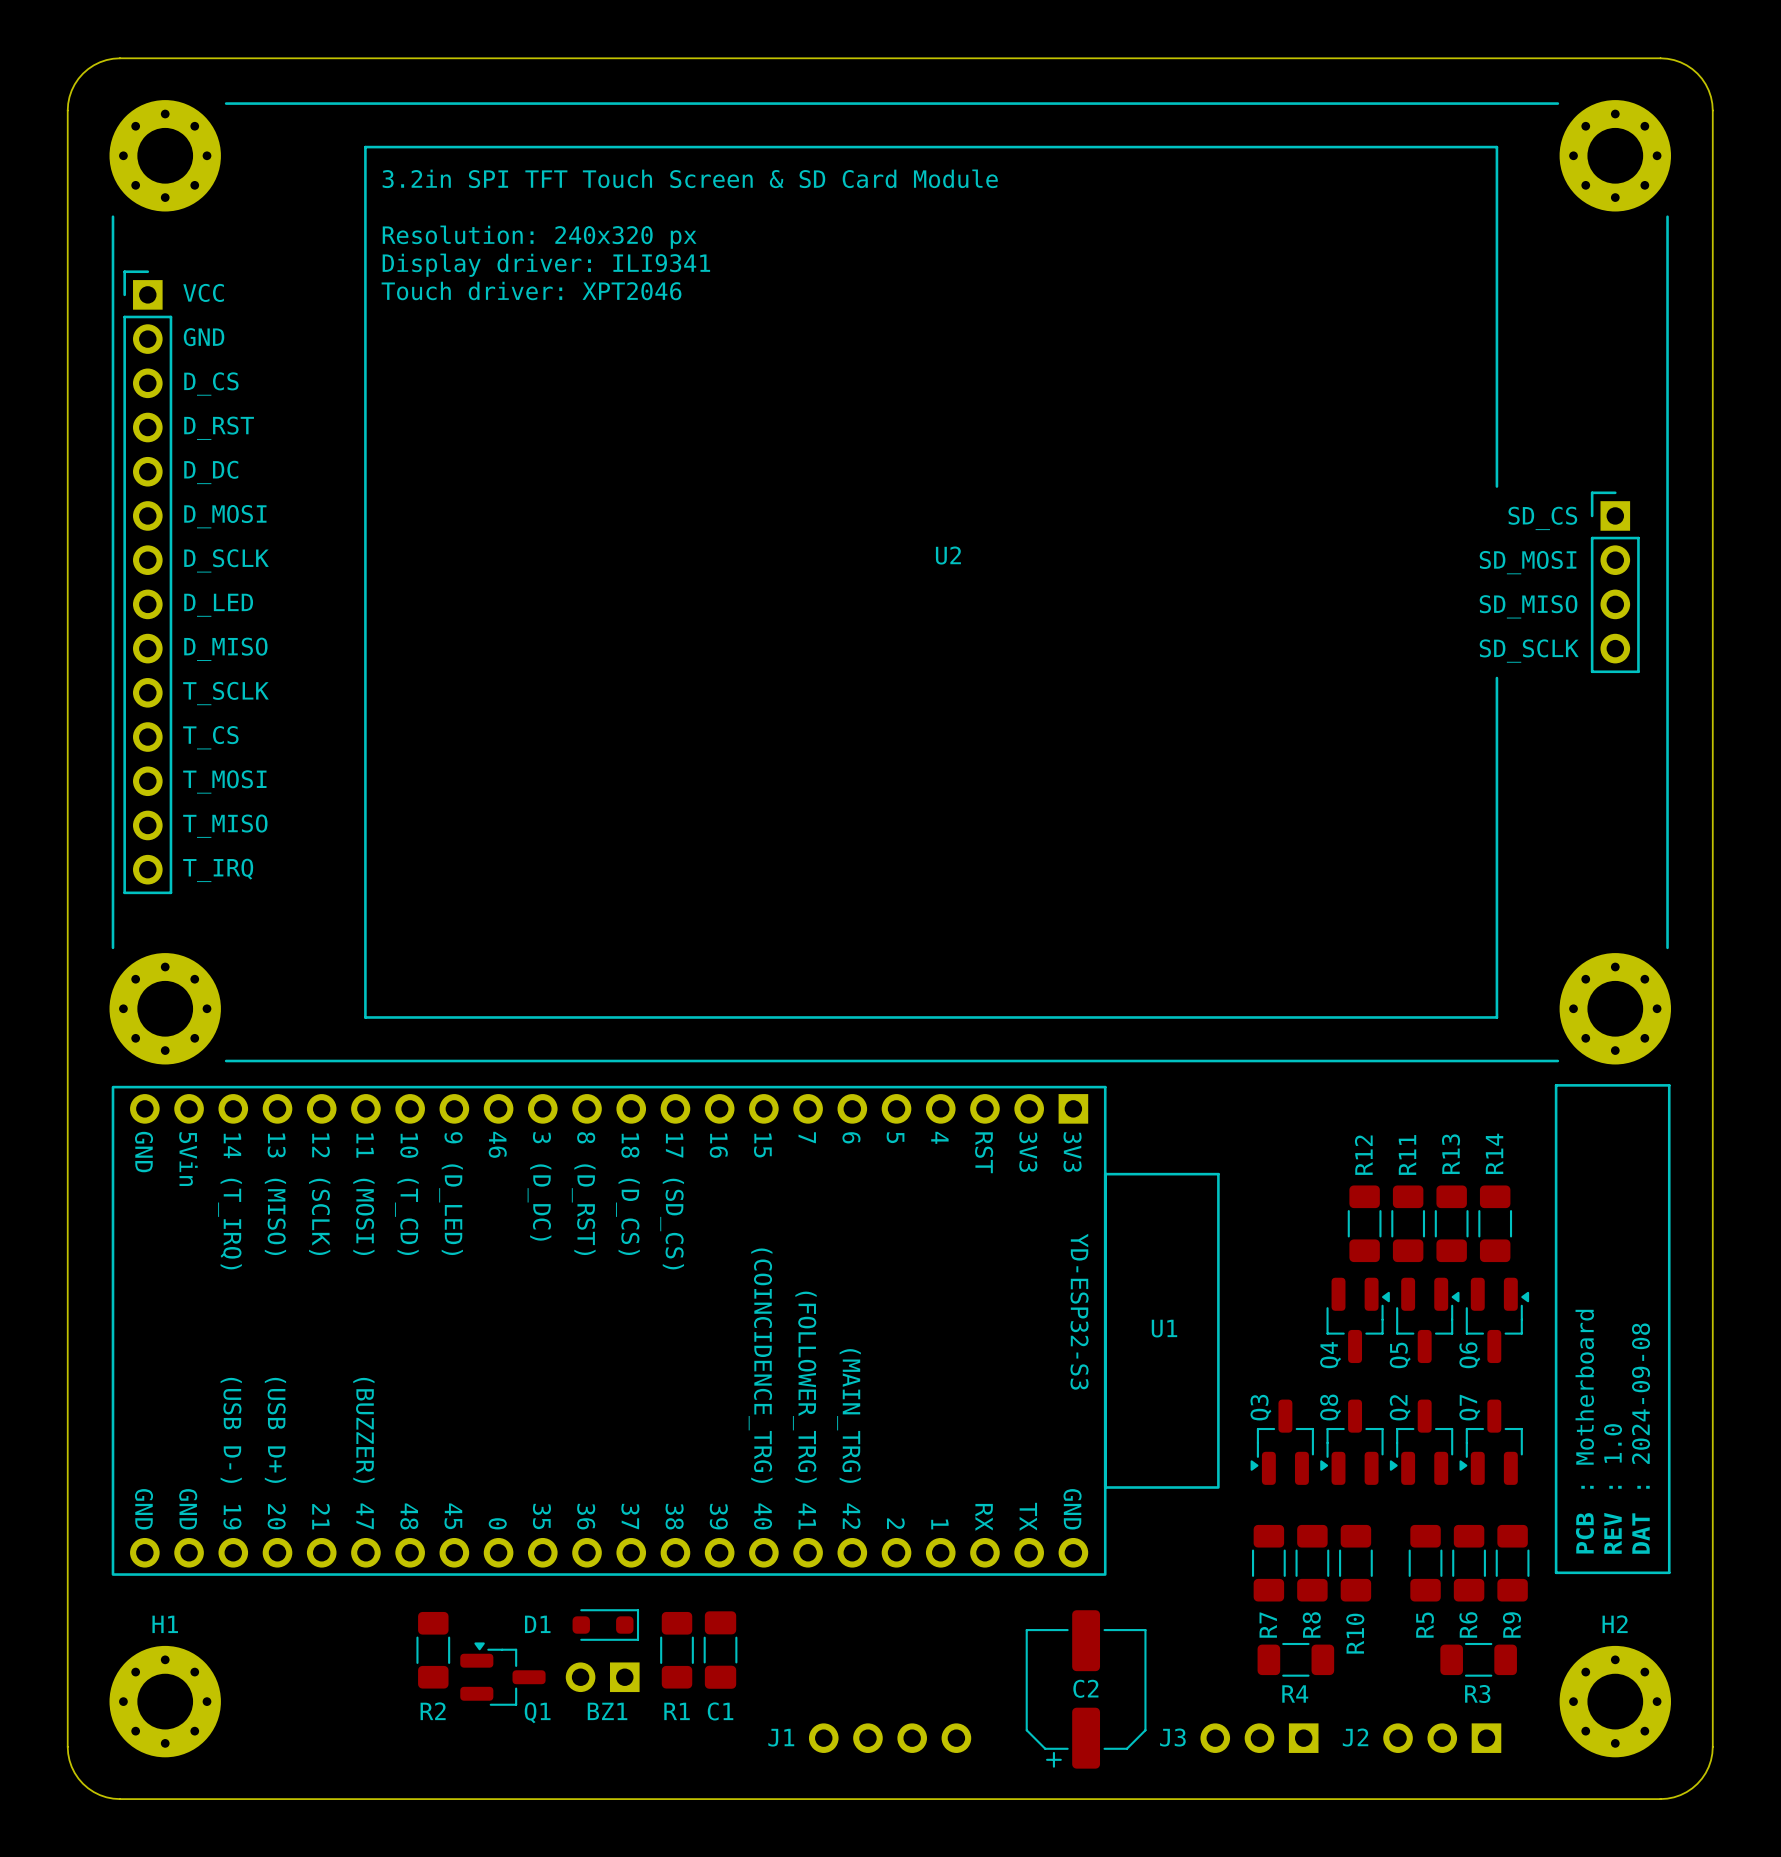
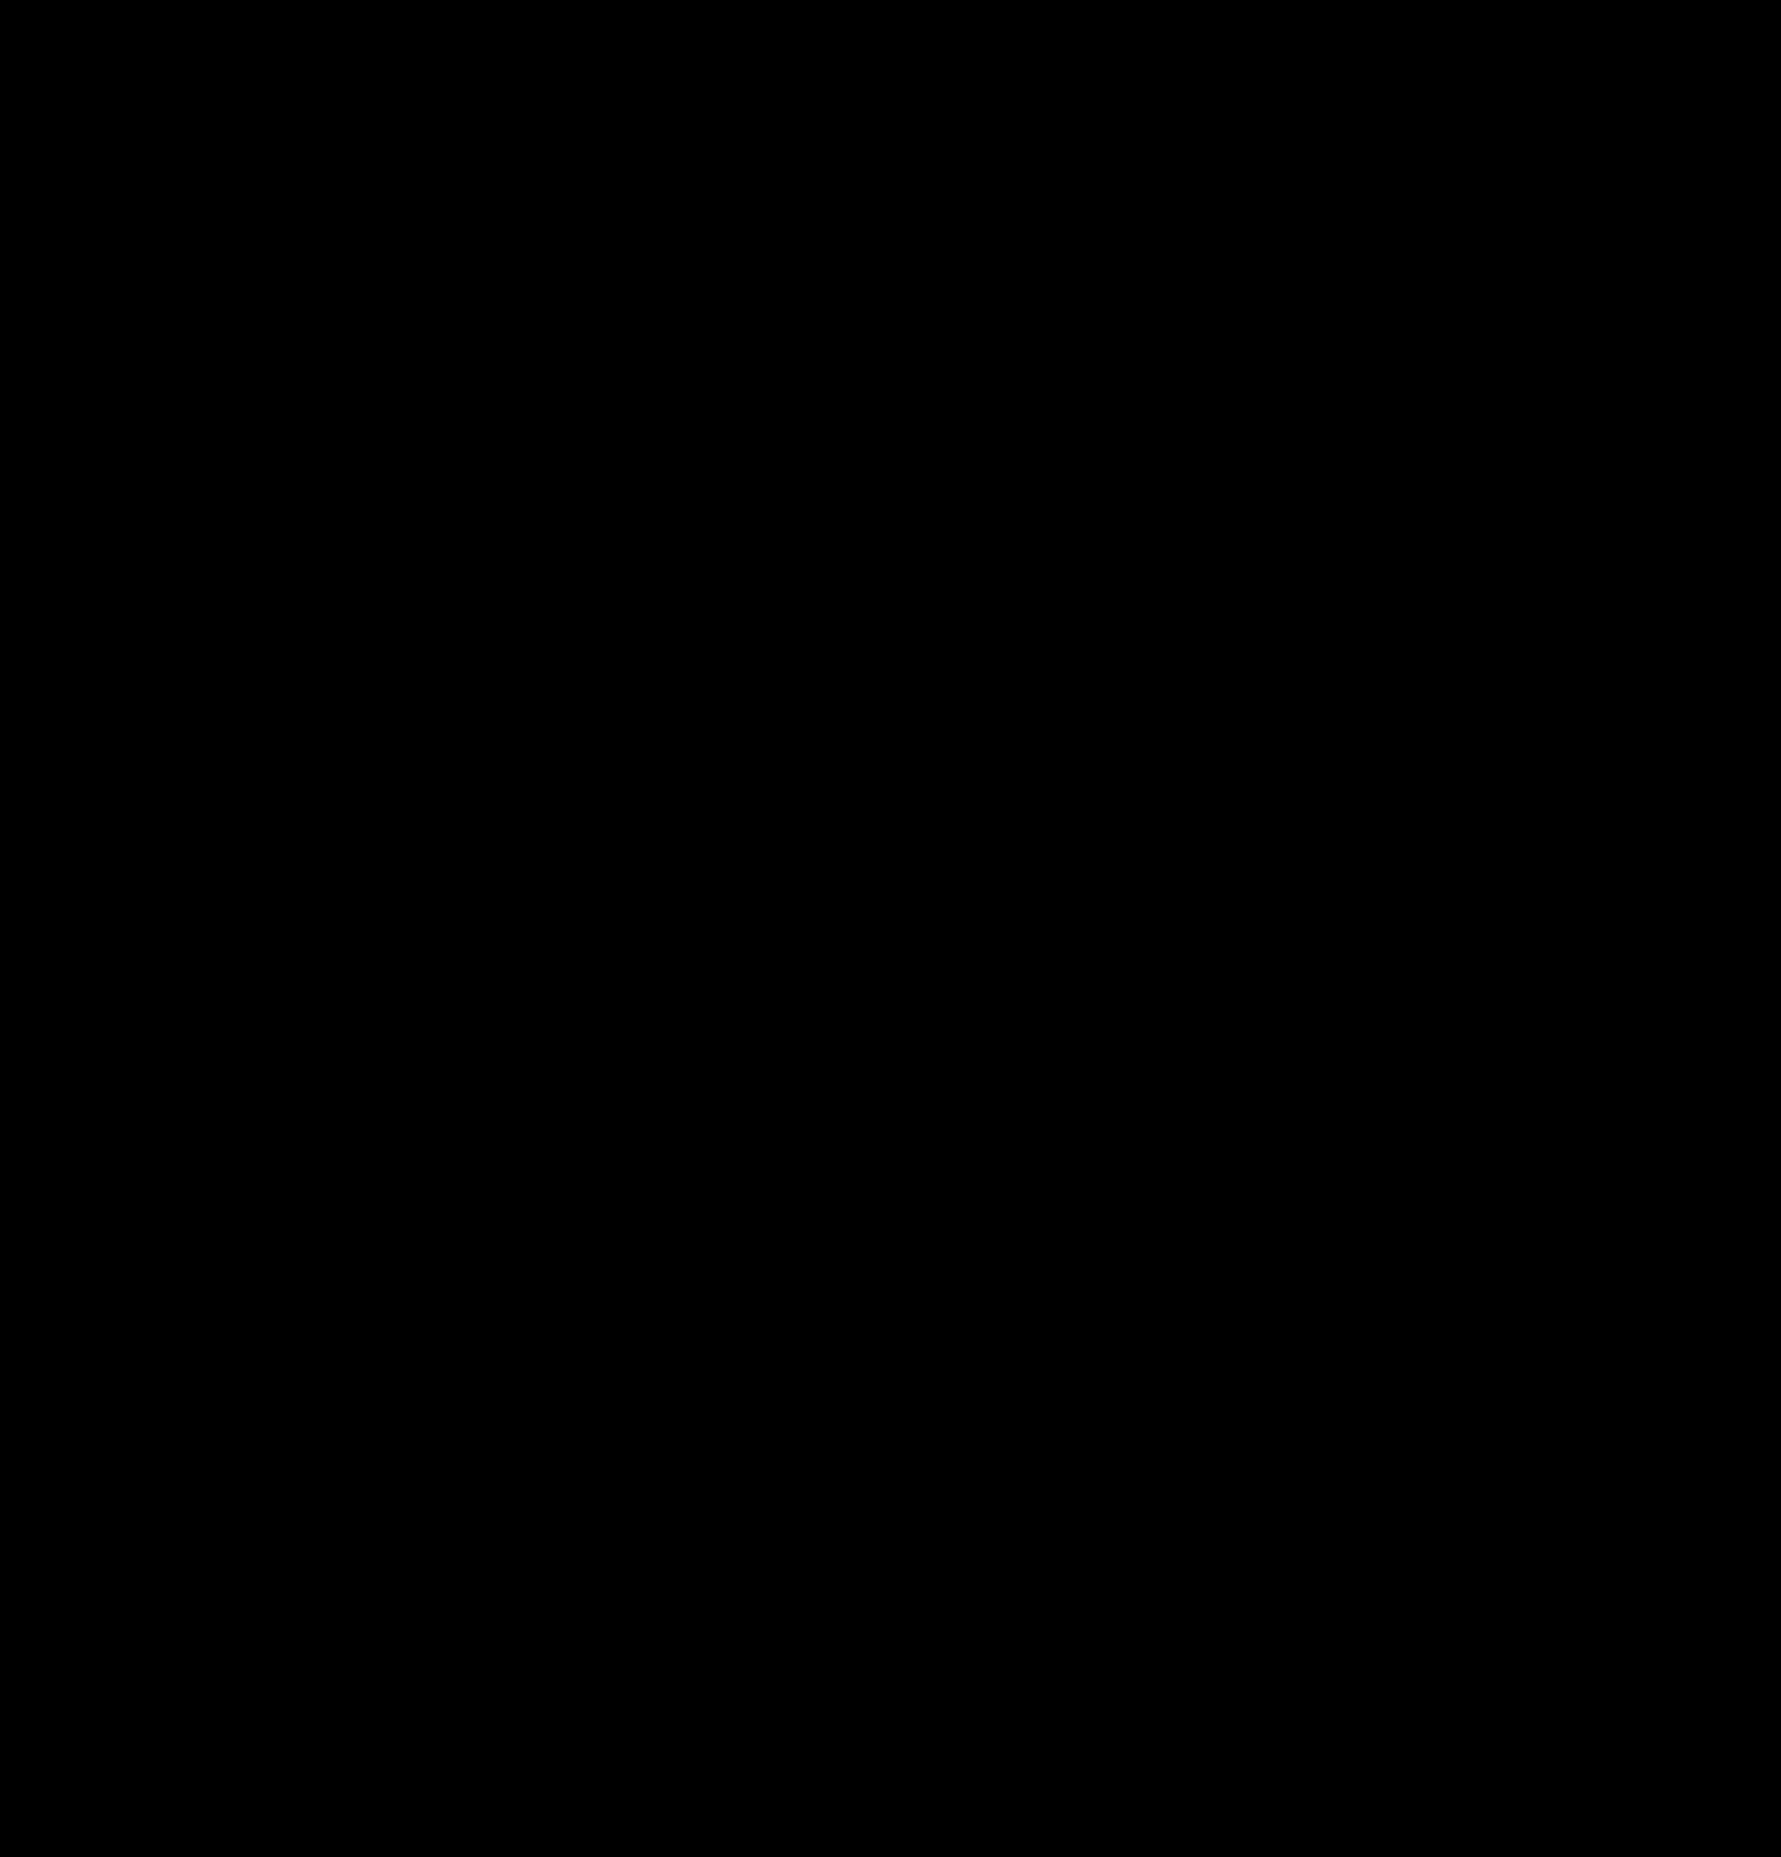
board edge: (119, 58) (1660, 58) (1680, 62) (1697, 73) (1708, 90) (1712, 110) (1712, 1746) (1708, 1766) (1697, 1783) (1680, 1795) (1660, 1799) (119, 1799) (99, 1795) (83, 1783) (71, 1766) (67, 1746) (67, 110) (71, 90) (83, 73) (99, 62) (119, 58) -> none
text: 3.2in SPI TFT Touch Screen & SD Card Module (690, 178) -> none
text: Resolution: 240x320 px (539, 237) -> none
text: Display driver: ILI9341 (546, 265) -> none
text: Touch driver: XPT2046 (531, 290) -> none
U2: (890, 582) -> none
line: (1556, 1085) (1669, 1085) (1669, 1572) (1556, 1572) (1556, 1085) -> none
R12: (1364, 1223) -> none
R11: (1408, 1223) -> none
R13: (1451, 1223) -> none
R14: (1495, 1223) -> none
text: YD-ESP32-S3 (1079, 1311) -> none
Q4: (1358, 1320) -> none
Q5: (1427, 1320) -> none
Q6: (1497, 1320) -> none
U1: (665, 1330) -> none
text: : Motherboard (1584, 1399) -> none
text: : 2024-09-08 (1641, 1406) -> none
Q3: (1282, 1442) -> none
Q8: (1351, 1442) -> none
Q2: (1421, 1442) -> none
Q7: (1491, 1442) -> none
text: : 1.0 (1613, 1456) -> none
text: PCB (1584, 1533) -> none
text: REV (1612, 1533) -> none
text: DAT (1641, 1533) -> none
R7: (1268, 1563) -> none
R8: (1312, 1563) -> none
R10: (1355, 1563) -> none
R5: (1425, 1563) -> none
R6: (1469, 1563) -> none
R9: (1512, 1563) -> none
D1: (605, 1625) -> none
R2: (433, 1650) -> none
R1: (677, 1650) -> none
C1: (720, 1650) -> none
R4: (1295, 1659) -> none
R3: (1478, 1659) -> none
Q1: (502, 1674) -> none
BZ1: (602, 1677) -> none
C2: (1086, 1689) -> none
H1: (165, 1701) -> none
H2: (1615, 1701) -> none
J1: (890, 1738) -> none
J3: (1259, 1738) -> none
J2: (1442, 1738) -> none

